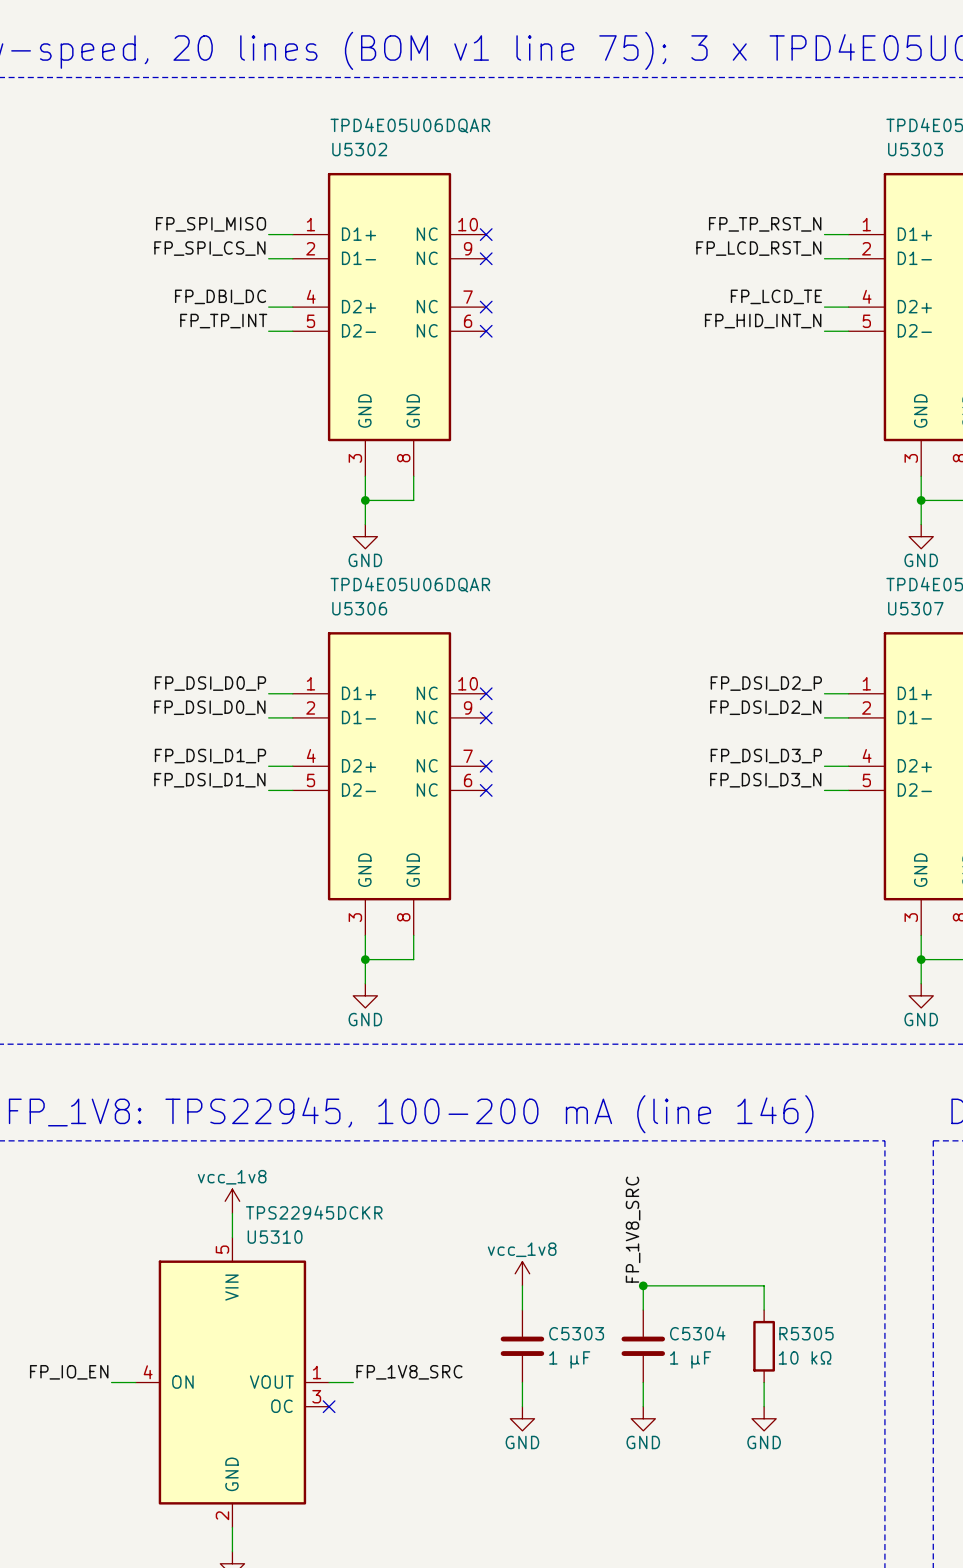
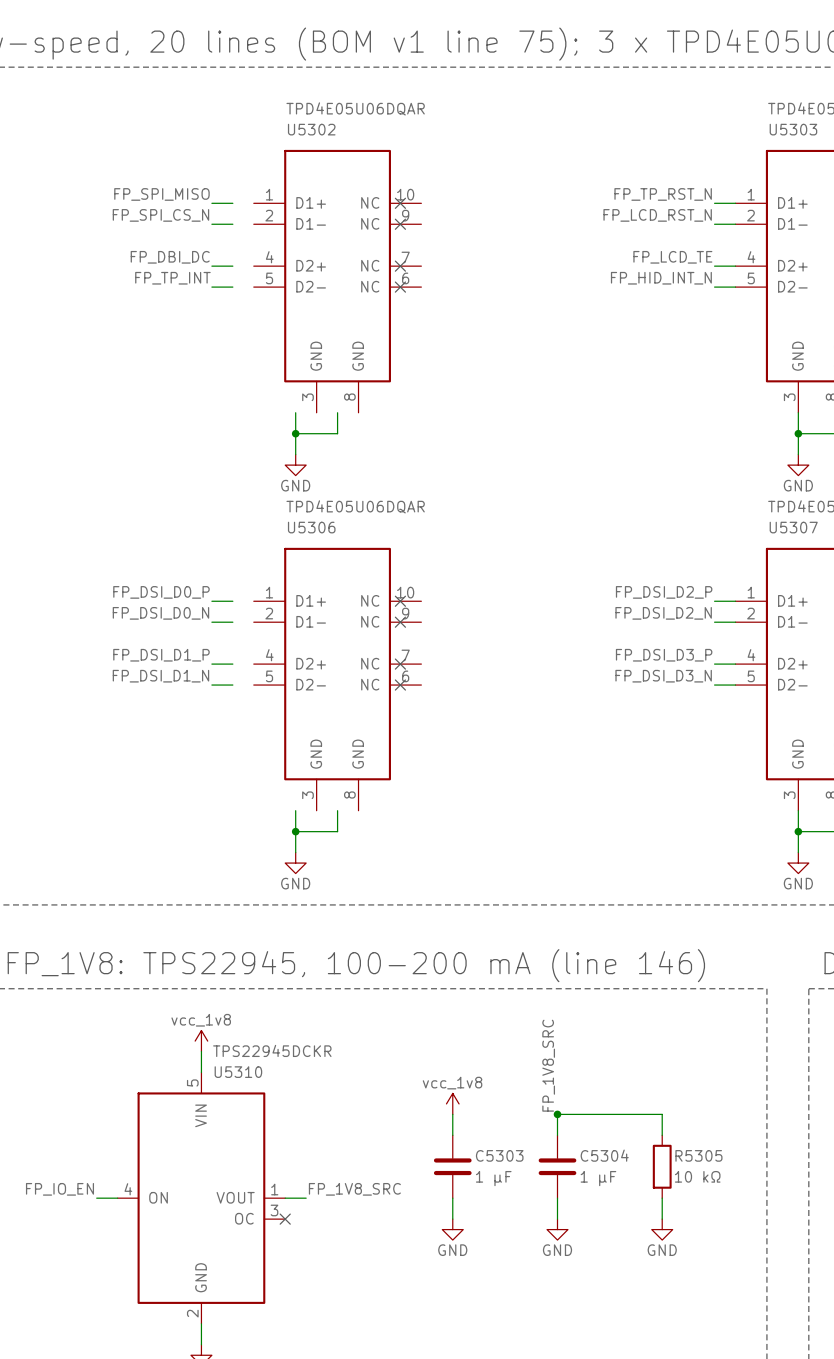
label position: FP_SPI_MISO (211, 224) -> FP_SPI_MISO (161, 194)
wire: (268, 234) (292, 234) -> (232, 203) (211, 203)
no-connect mark: none -> (400, 203)
no-connect mark: (486, 234) -> none
label position: FP_SPI_CS_N (209, 248) -> FP_SPI_CS_N (160, 215)
wire: (268, 258) (292, 258) -> (232, 224) (211, 224)
no-connect mark: none -> (400, 224)
no-connect mark: (486, 258) -> none
label position: FP_DBI_DC (220, 296) -> FP_DBI_DC (170, 257)
wire: (268, 307) (292, 307) -> (232, 266) (211, 266)
no-connect mark: none -> (400, 266)
no-connect mark: (486, 307) -> none
label position: FP_TP_INT (223, 321) -> FP_TP_INT (172, 278)
wire: (268, 331) (292, 331) -> (232, 287) (211, 287)
no-connect mark: none -> (400, 287)
no-connect mark: (486, 331) -> none
wire: (365, 476) (365, 524) -> (295, 412) (295, 454)
wire: (413, 476) (413, 500) (389, 500) -> (337, 412) (337, 433)
wire: none -> (295, 433) (316, 433)
junction position: (365, 500) -> (295, 433)
power symbol position: GND (365, 536) -> GND (295, 465)
label position: FP_DSI_D0_P (210, 683) -> FP_DSI_D0_P (161, 592)
wire: (268, 693) (292, 693) -> (232, 601) (211, 601)
no-connect mark: none -> (400, 601)
no-connect mark: (486, 693) -> none
label position: FP_DSI_D0_N (209, 707) -> FP_DSI_D0_N (160, 613)
wire: (268, 717) (292, 717) -> (232, 622) (211, 622)
no-connect mark: none -> (400, 622)
no-connect mark: (486, 717) -> none
label position: FP_DSI_D1_P (210, 756) -> FP_DSI_D1_P (161, 655)
wire: (268, 766) (292, 766) -> (232, 664) (211, 664)
no-connect mark: none -> (400, 664)
no-connect mark: (486, 766) -> none
label position: FP_DSI_D1_N (209, 780) -> FP_DSI_D1_N (160, 676)
wire: (268, 790) (292, 790) -> (232, 685) (211, 685)
no-connect mark: none -> (400, 685)
no-connect mark: (486, 790) -> none
wire: (365, 935) (365, 983) -> (295, 810) (295, 852)
wire: (413, 935) (413, 959) (389, 959) -> (337, 810) (337, 831)
wire: none -> (295, 831) (316, 831)
junction position: (365, 959) -> (295, 831)
power symbol position: GND (365, 995) -> GND (295, 863)

